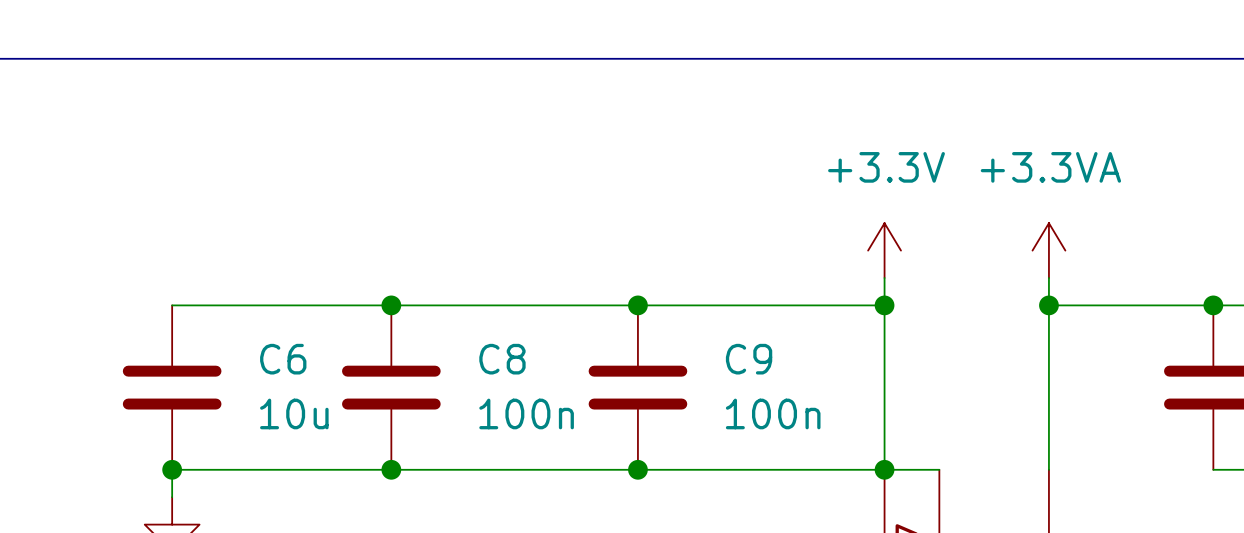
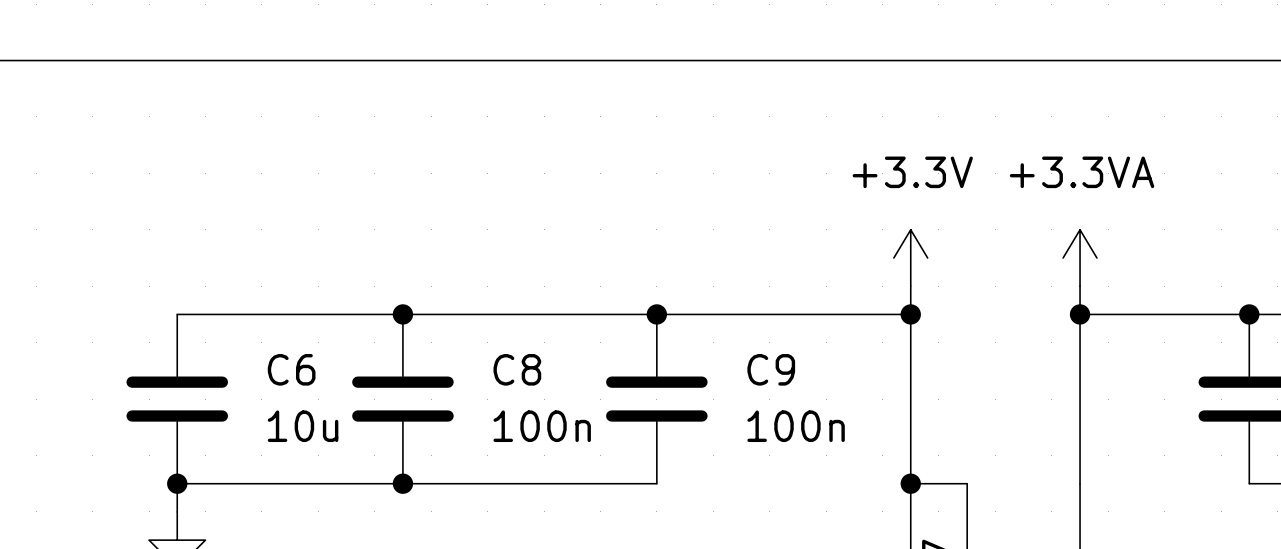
wire: (637, 469) (884, 469) -> none
junction: (637, 469) -> none

